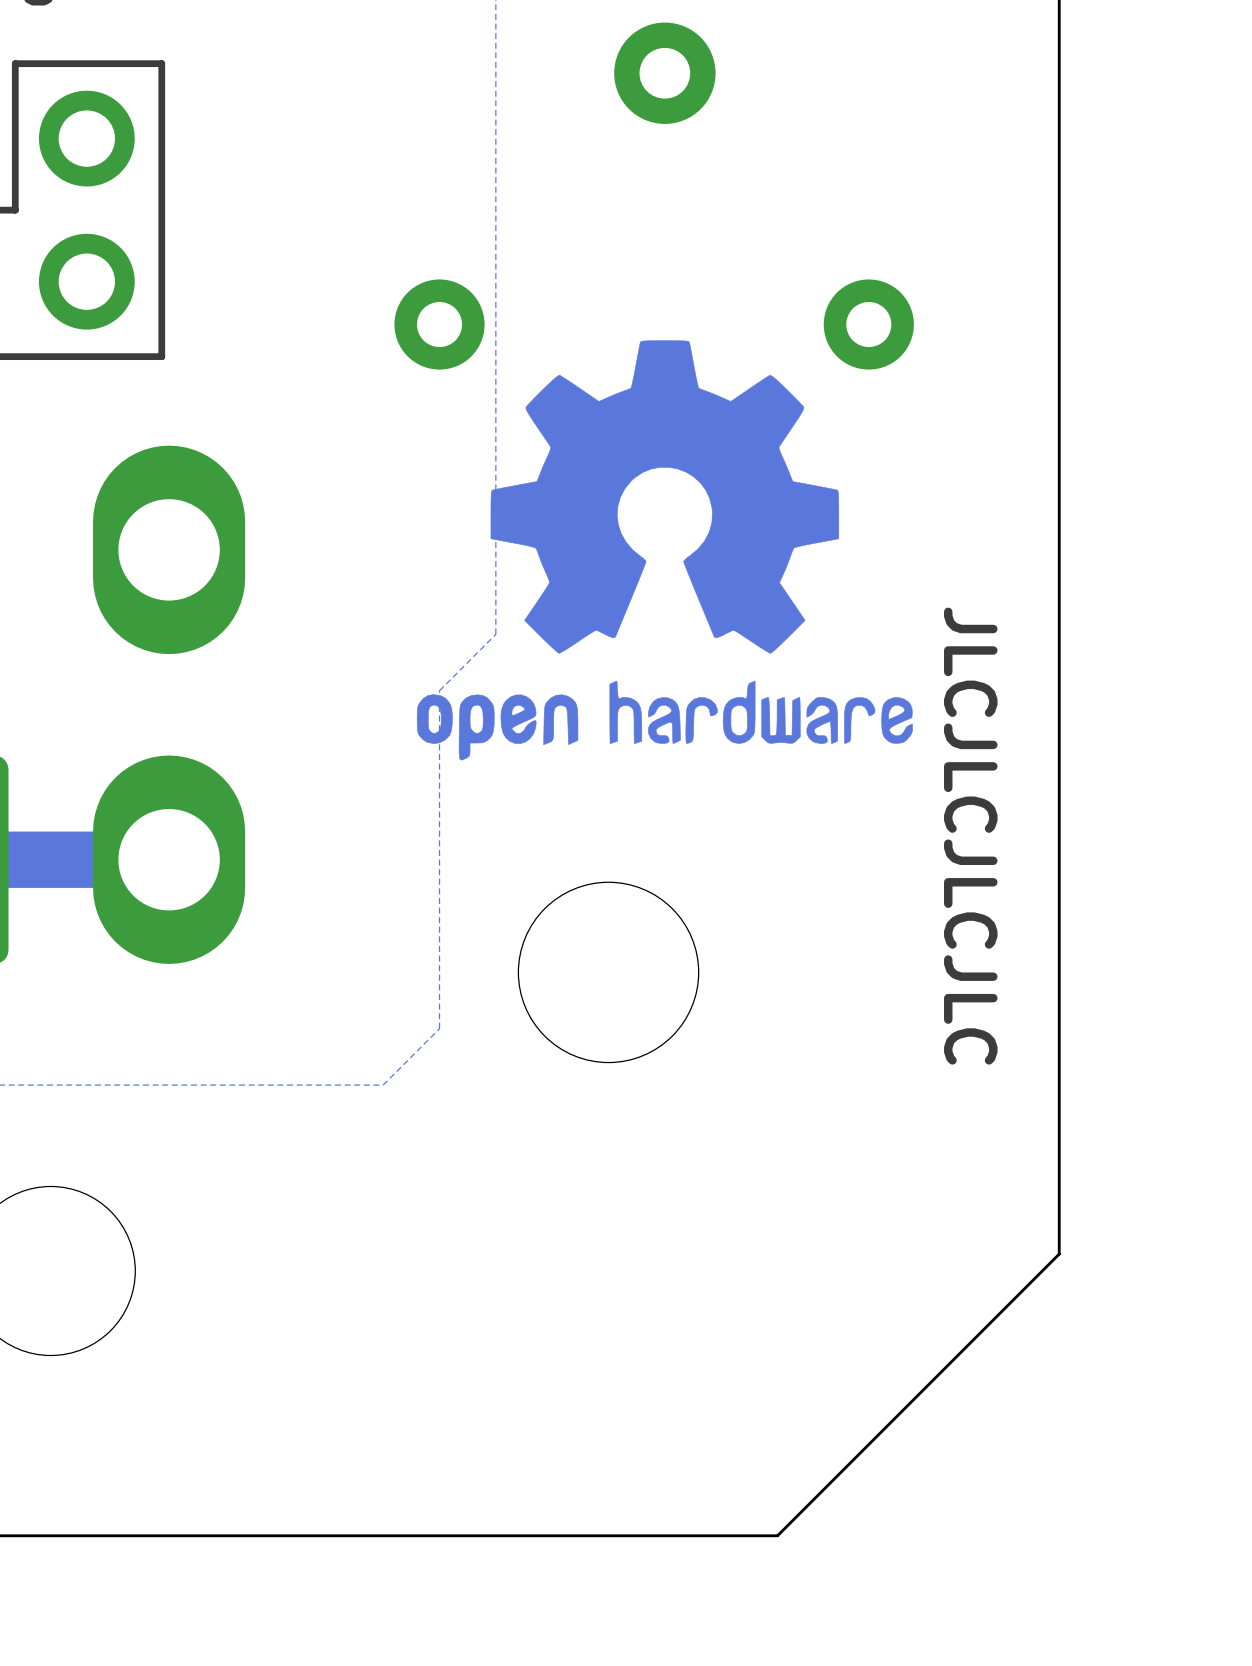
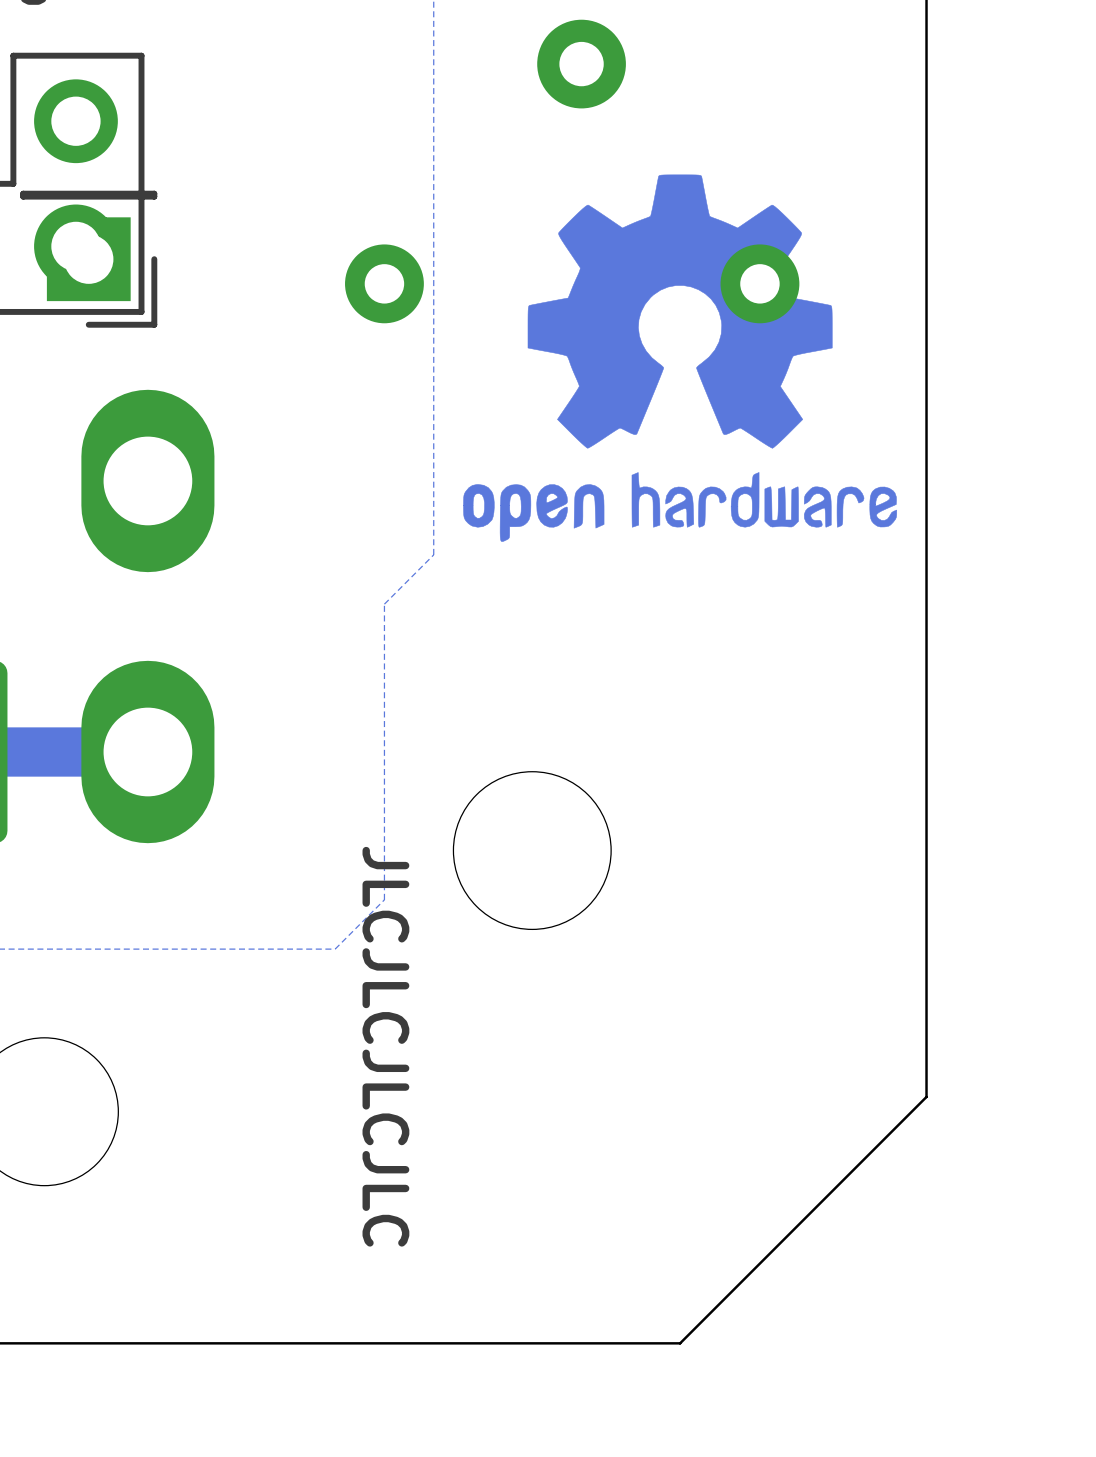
part: none -> (88, 259)
drawing position: (664, 550) -> (680, 358)
text position: JLCJLCJLCJLC (970, 836) -> JLCJLCJLCJLC (385, 1046)

